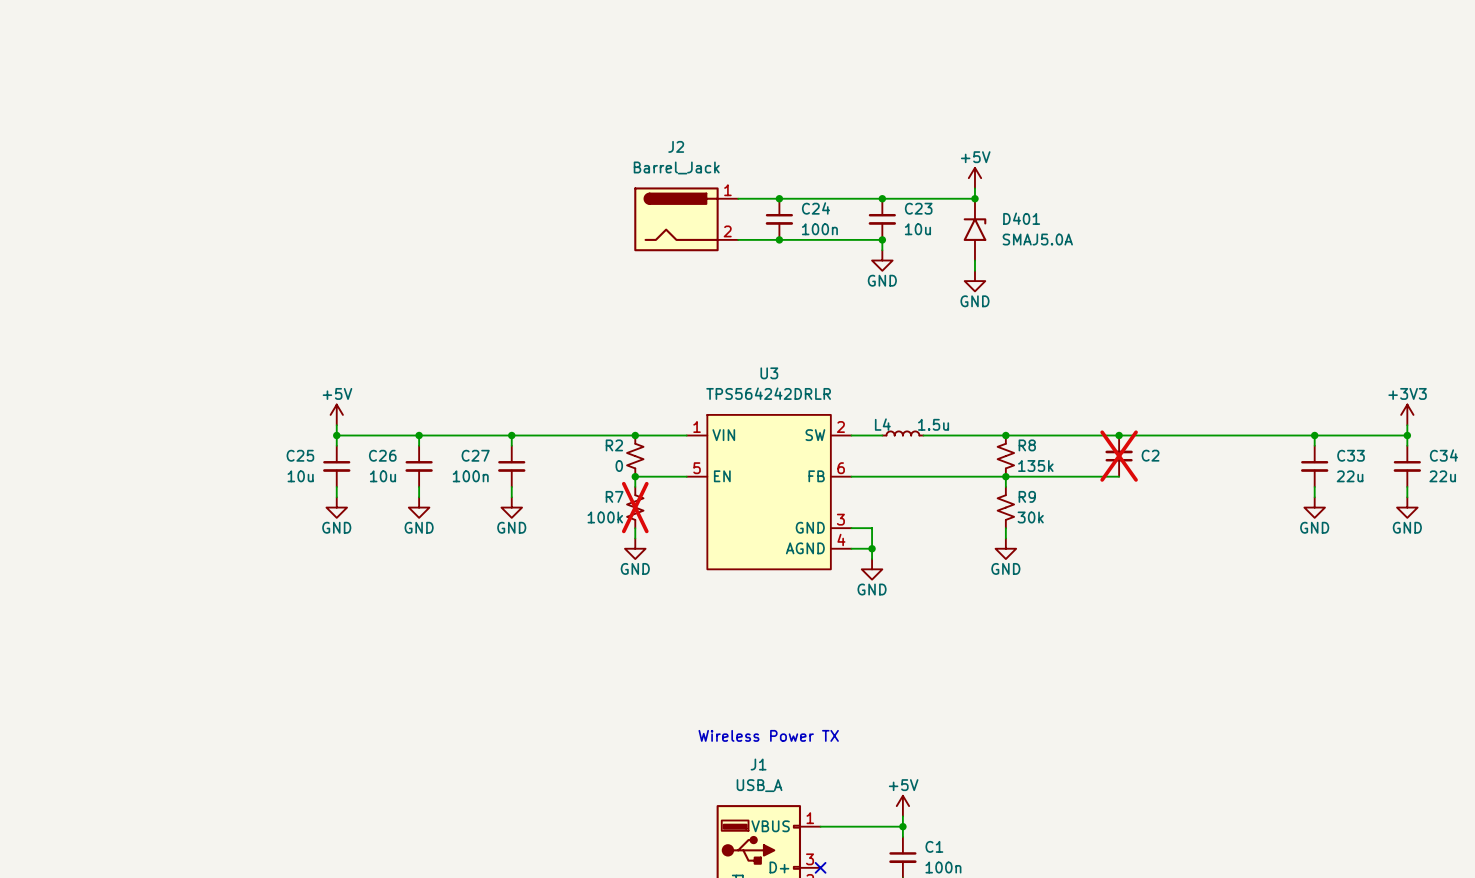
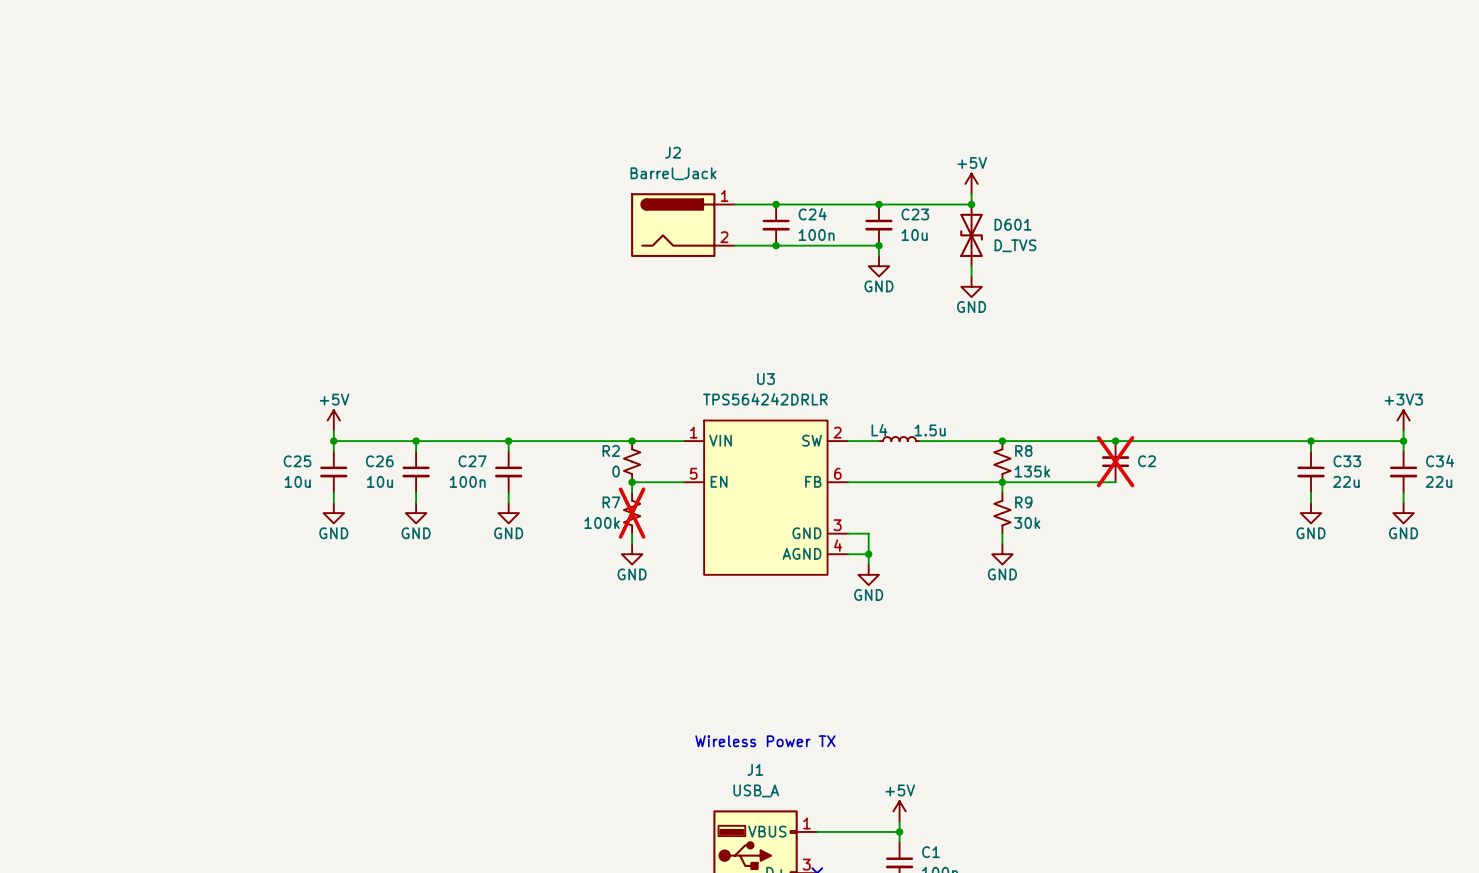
D401: SMAJ5.0A (974, 229) -> none
D601: none -> D_TVS (971, 235)

